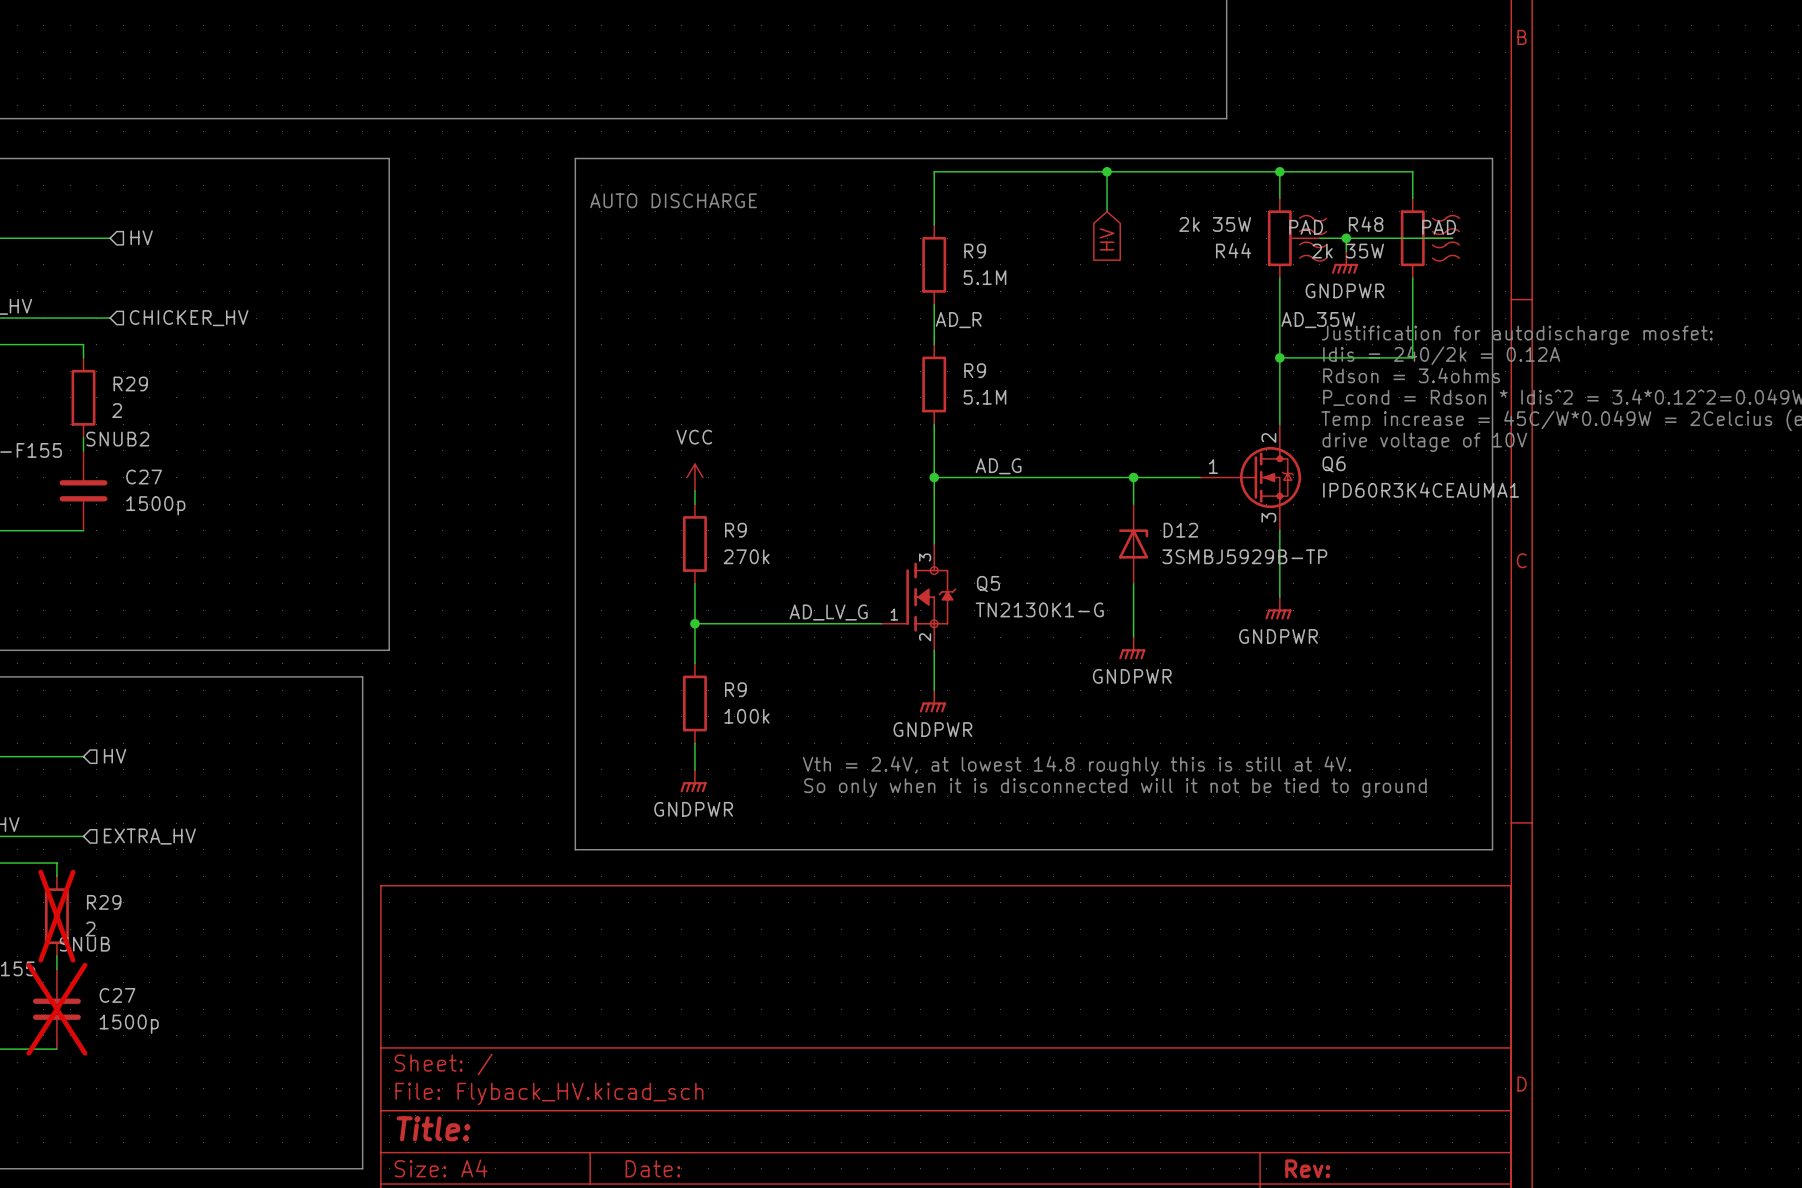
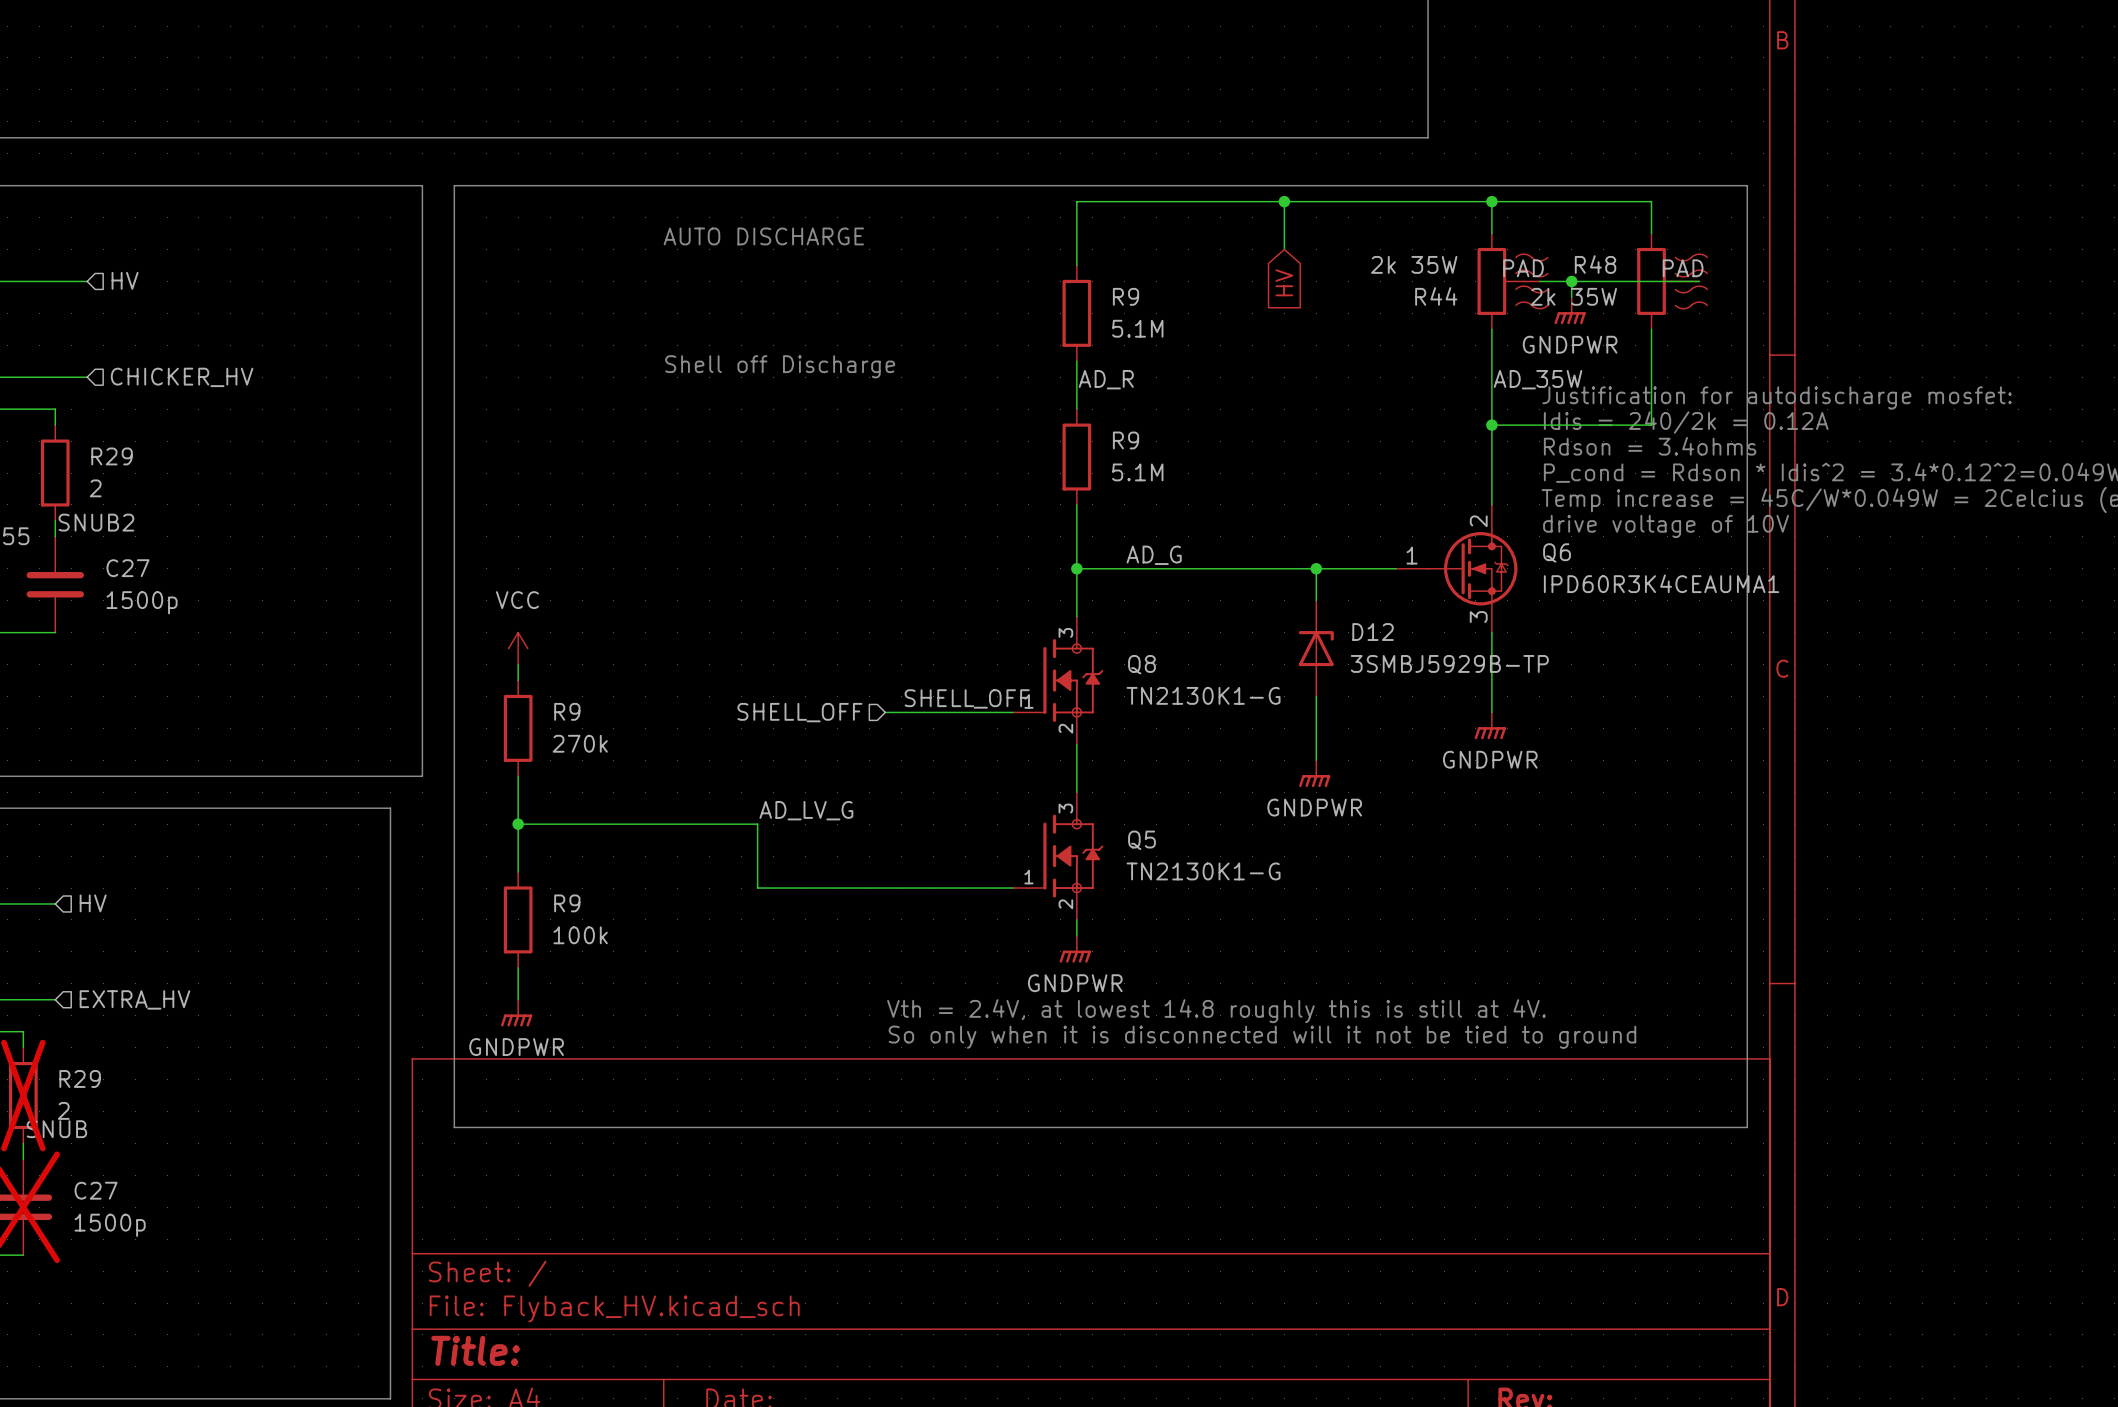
line: (575, 158) (575, 849) (1492, 849) -> (645, 185) (454, 185) (454, 1127) (1747, 1127) (1747, 1015)
text: none -> Shell off Discharge (780, 366)
power symbol position: VCC (694, 477) -> VCC (518, 648)
wire: (694, 490) (694, 504) -> (518, 664) (518, 680)
R9 position: (694, 543) -> (518, 728)
Q8: none -> TN2130K1-G (1058, 680)
wire: (694, 583) (694, 663) -> (518, 776) (518, 872)
label: none -> SHELL_OFF (967, 698)
hierarchical label: none -> SHELL_OFF (799, 712)
wire: none -> (885, 712) (1013, 712)
Q5 position: (918, 597) -> (1058, 856)
label position: AD_LV_G (828, 612) -> AD_LV_G (806, 810)
wire: (694, 623) (881, 623) -> none
junction: (694, 623) -> none
wire: none -> (518, 824) (757, 824) (757, 888) (1013, 888)
junction: none -> (518, 824)
power symbol position: GNDPWR (932, 701) -> GNDPWR (1075, 949)
R9 position: (694, 703) -> (518, 919)
wire: (694, 743) (694, 769) -> (518, 967) (518, 999)
text position: Vth = 2.4V, at lowest 14.8 roughly this is still at 4V. (1077, 766) -> Vth = 2.4V, at lowest 14.8 roughly this is still at 4V. (1216, 1011)
wire: none -> (1076, 919) (1076, 935)
power symbol: GNDPWR (693, 781) -> none
text position: So only when it is disconnected will it not be tied to ground (1115, 787) -> So only when it is disconnected will it not be tied to ground (1262, 1037)
power symbol: none -> GNDPWR (516, 1013)

